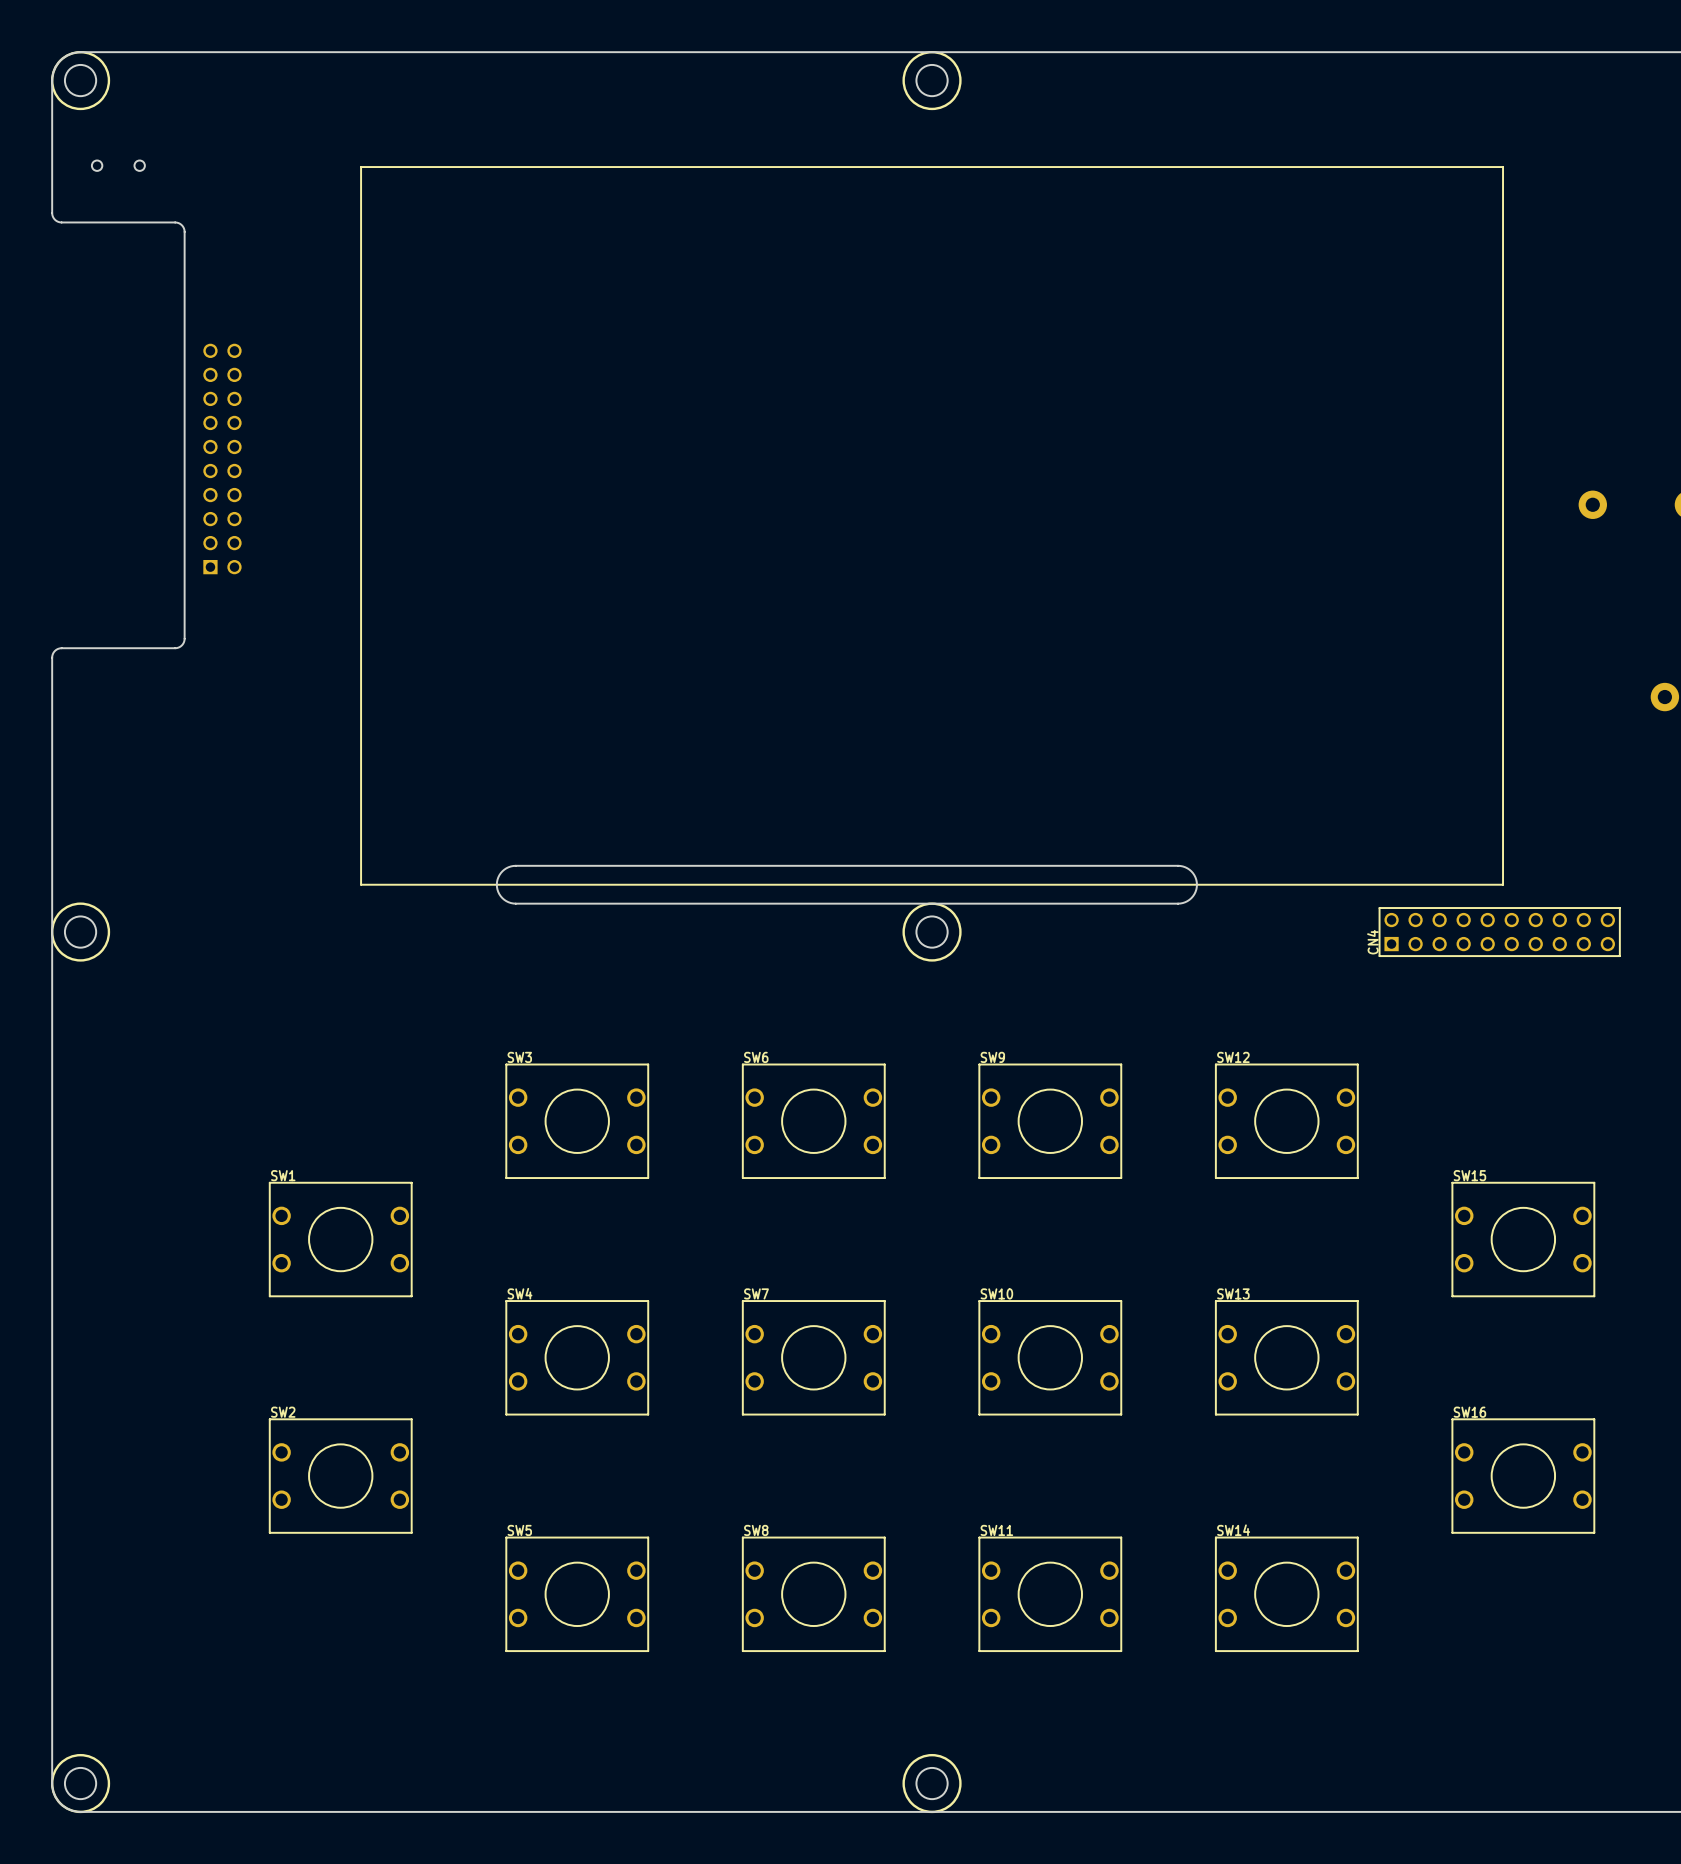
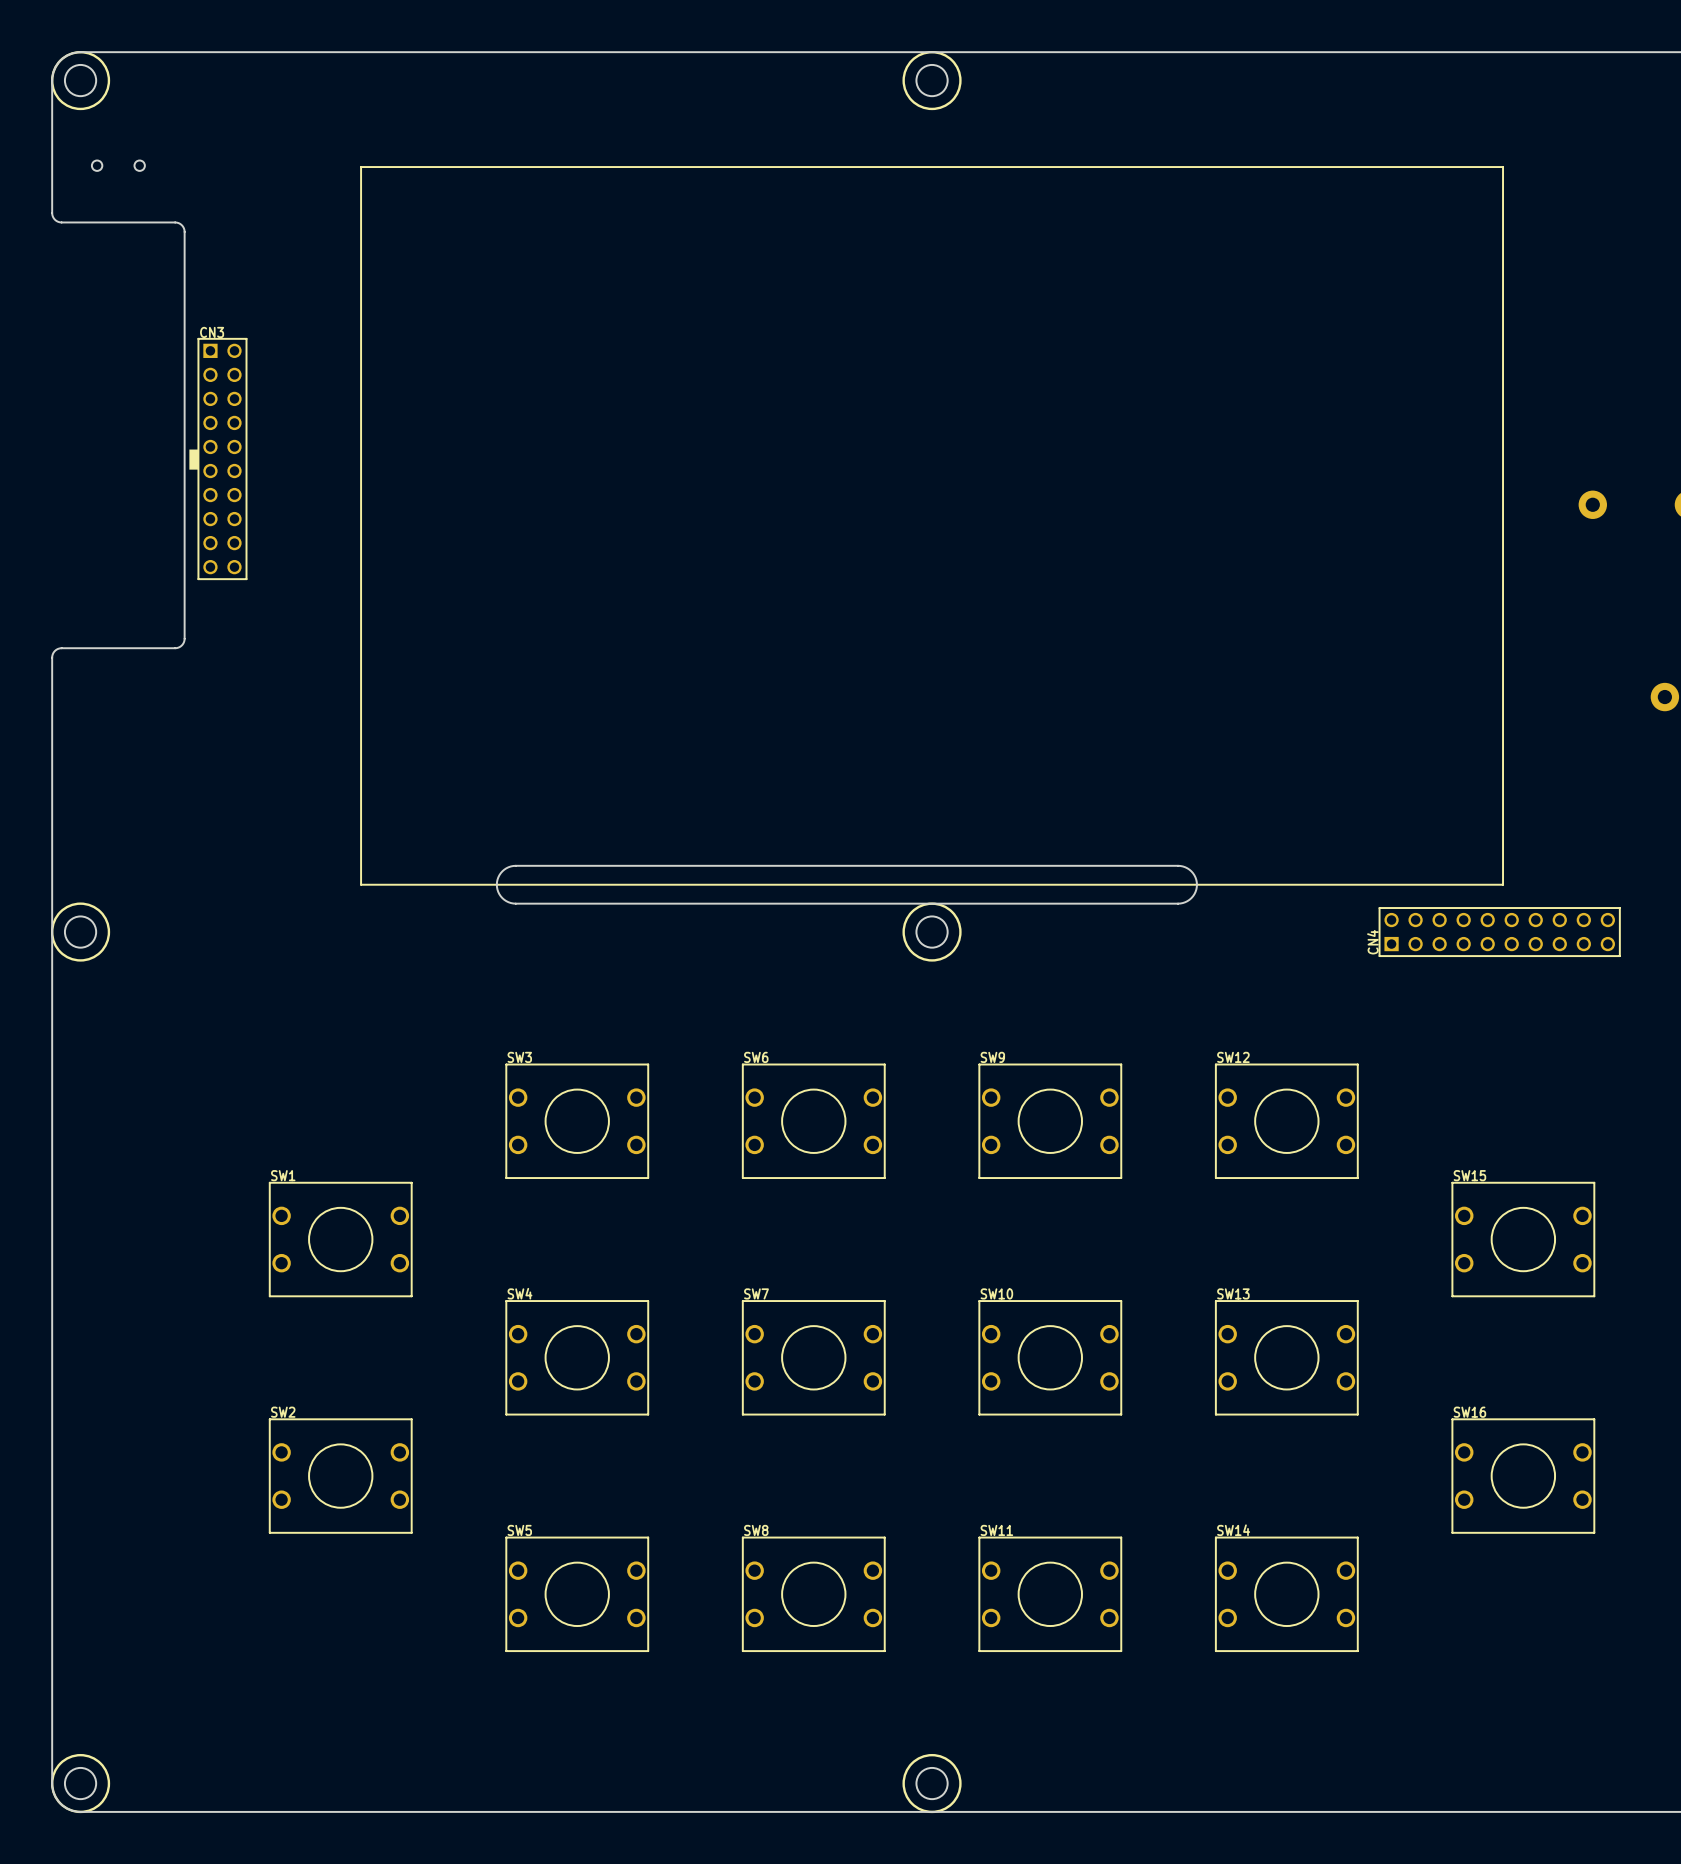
drawing: none -> [189, 449, 199, 470]
CN3 side: bottom (222, 458) -> top (222, 458)

